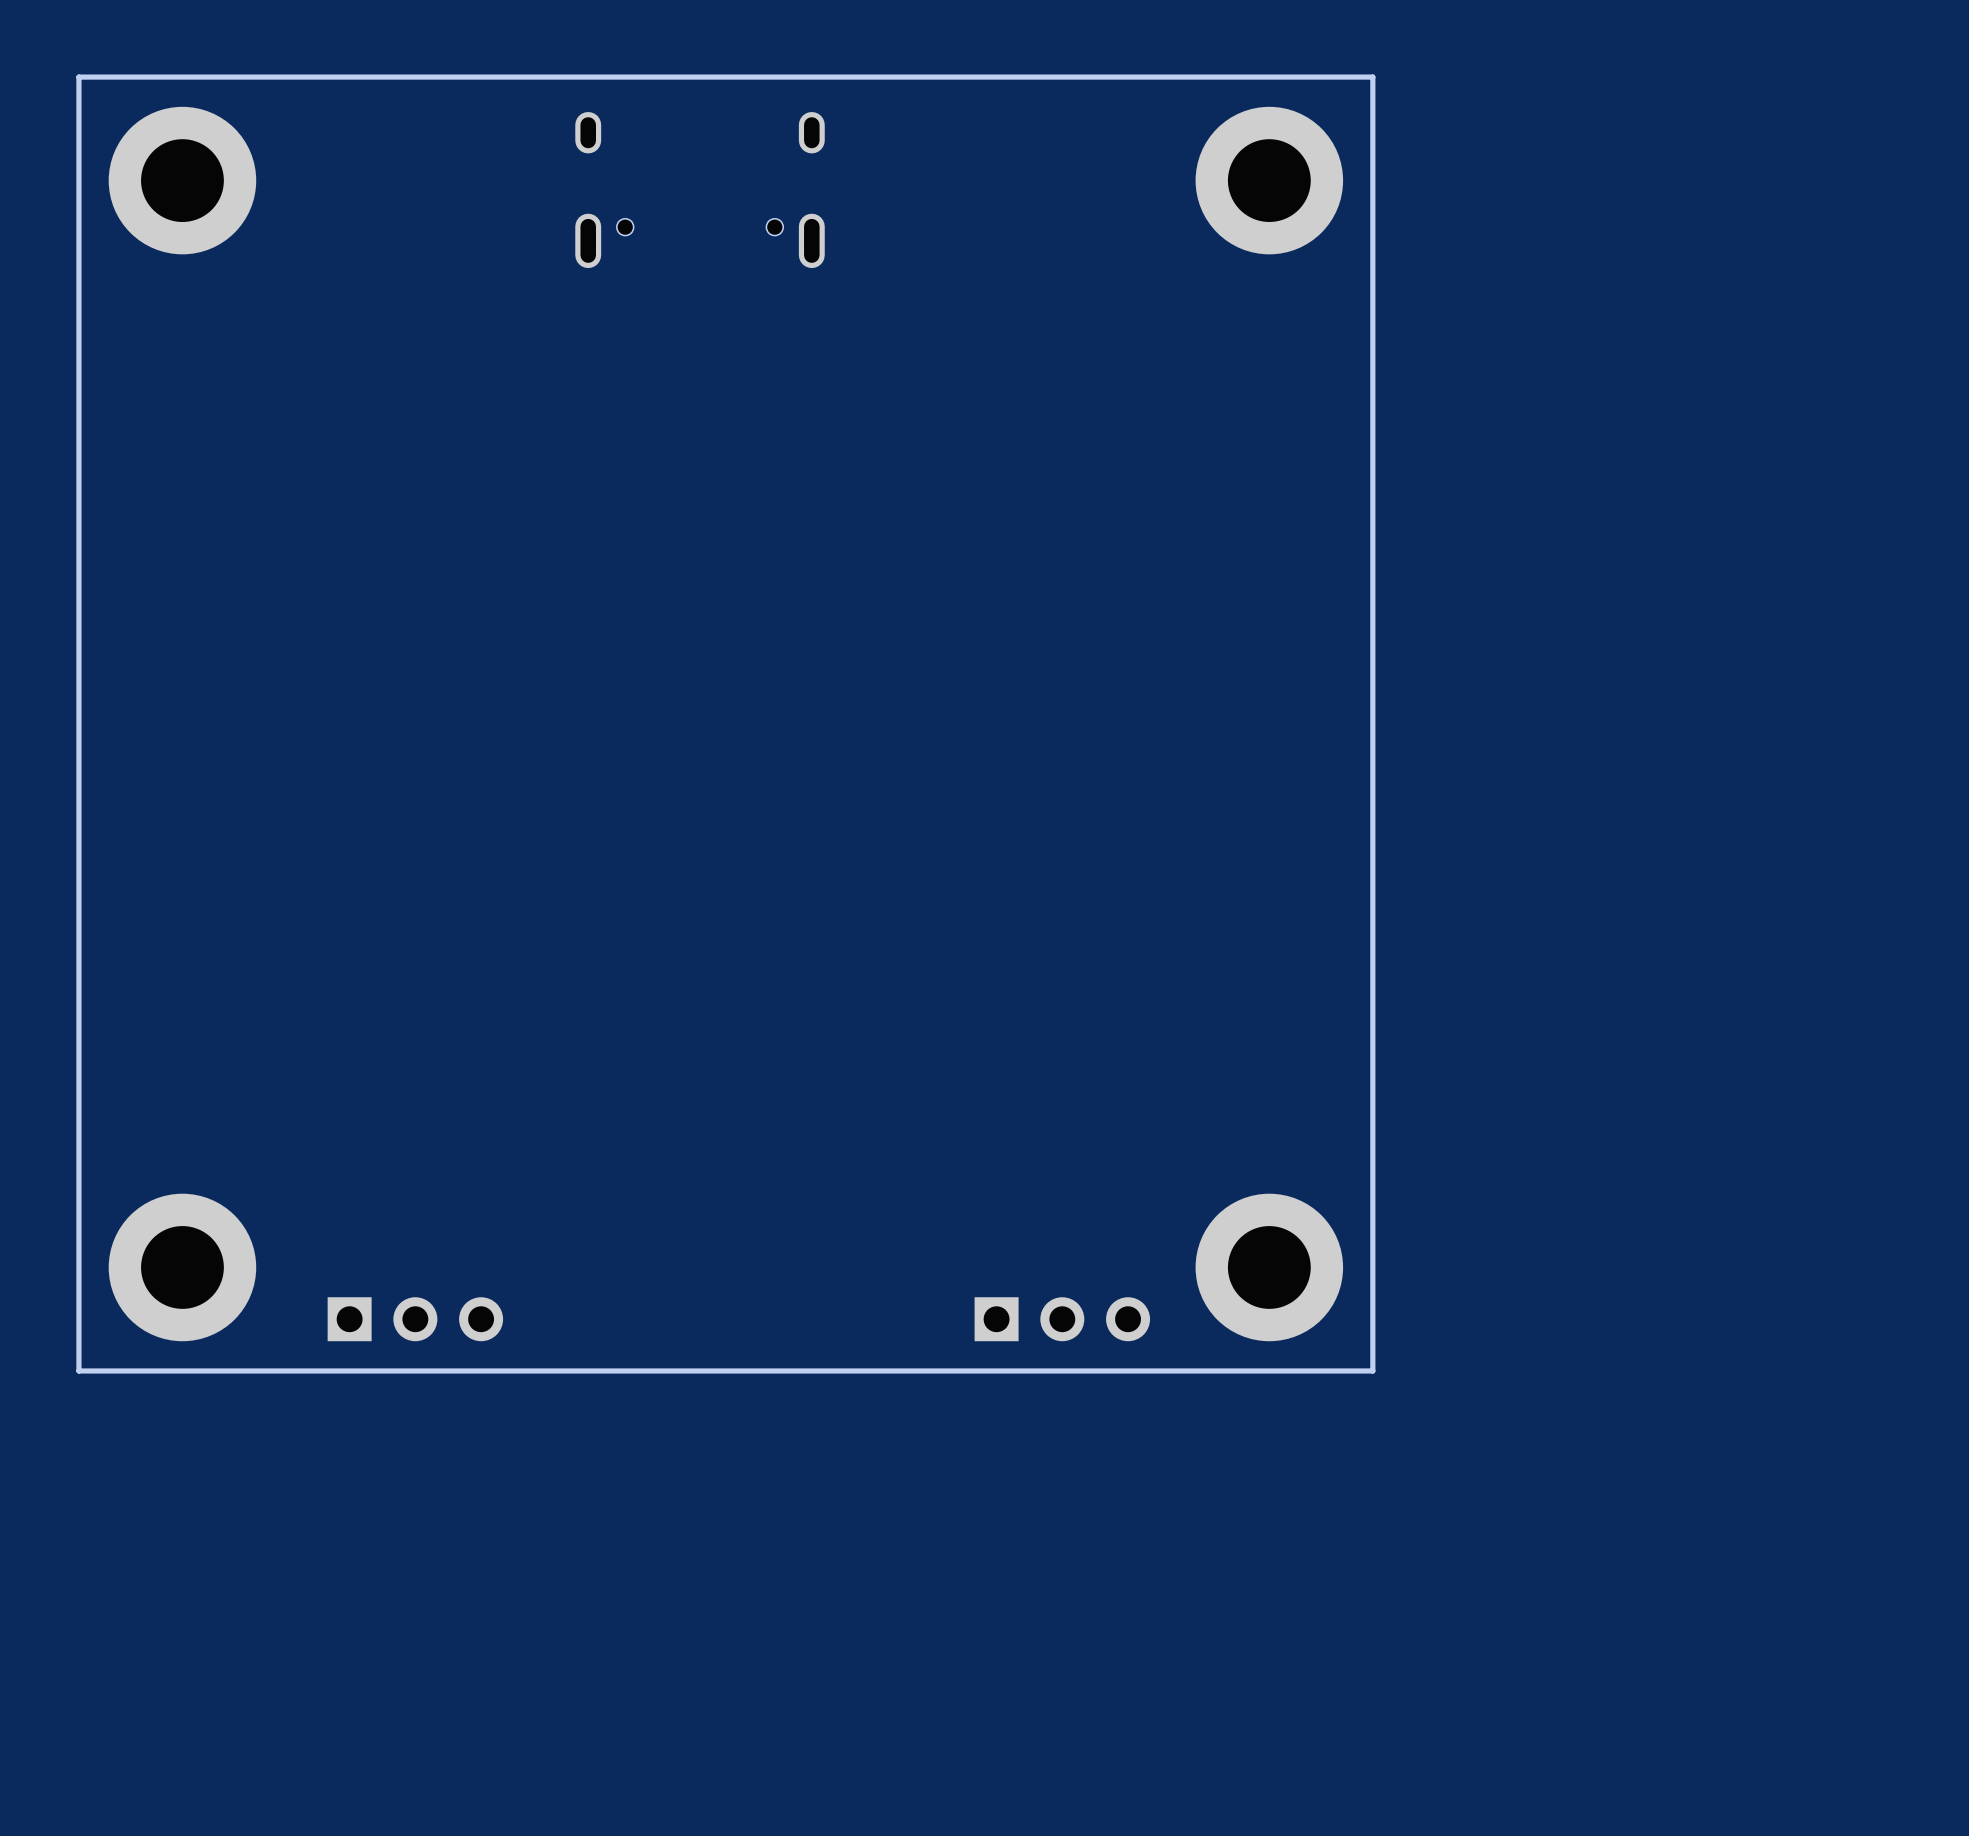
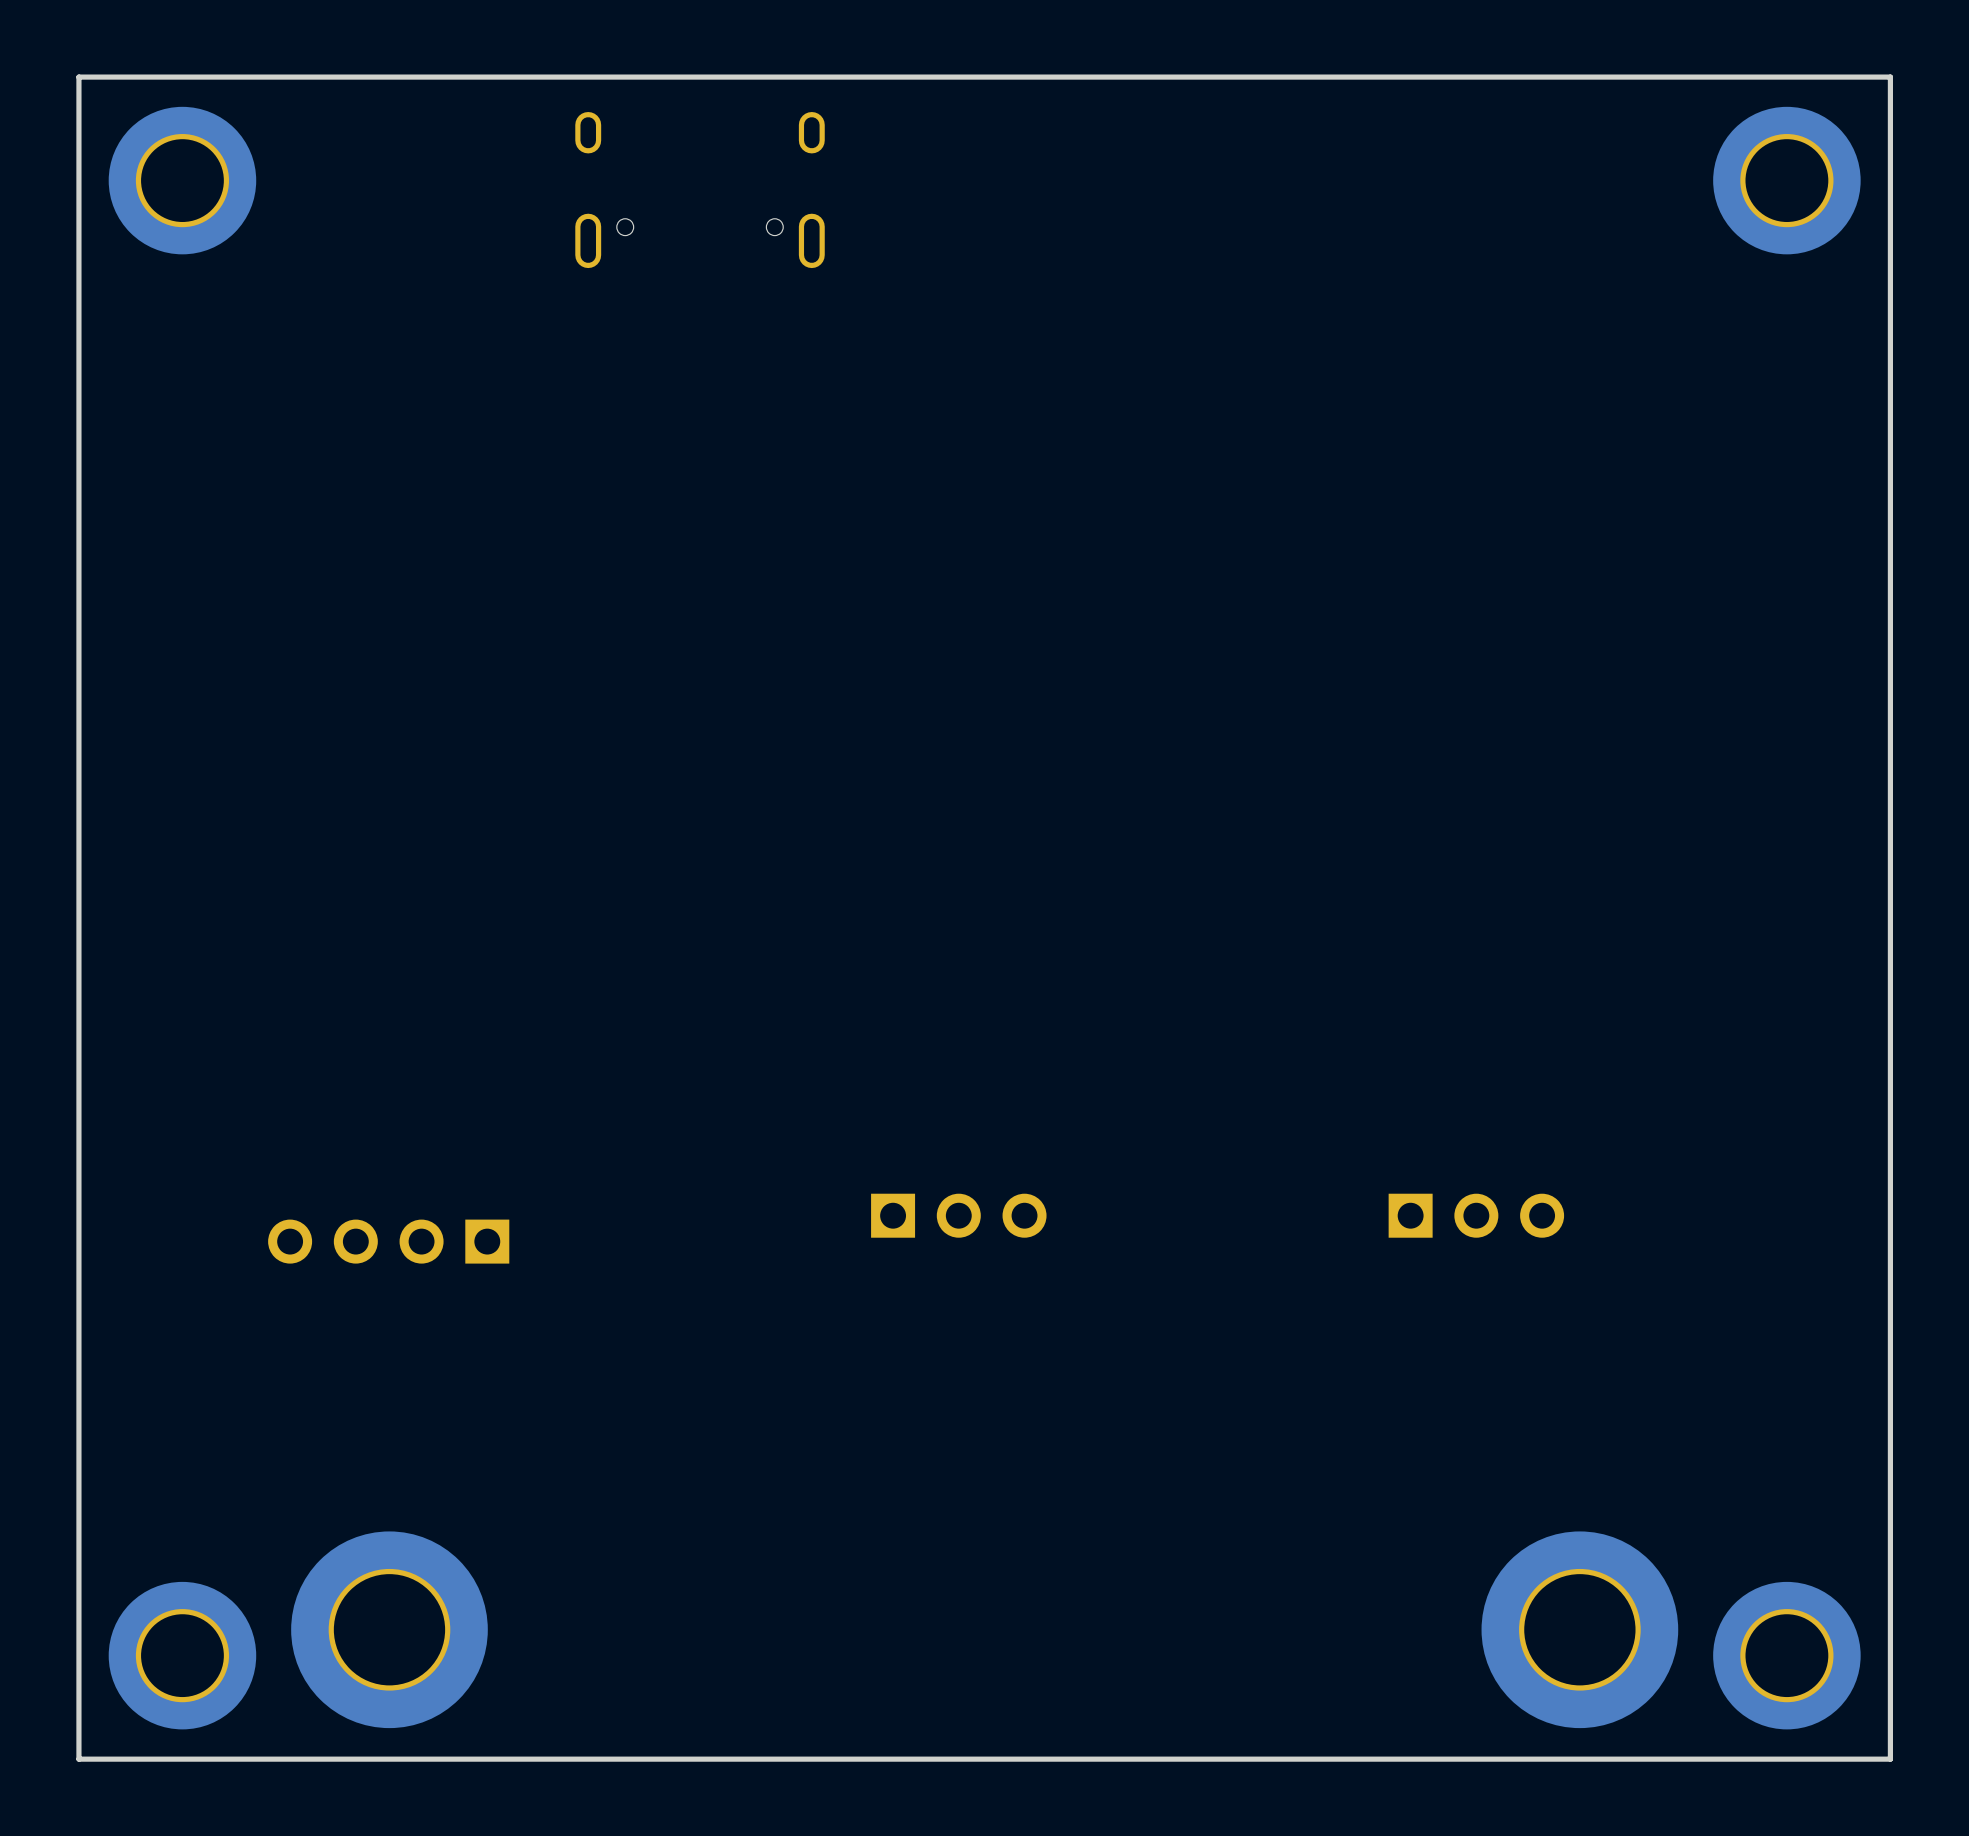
board edge: (1372, 77) (1372, 1370) (78, 1370) -> (1372, 77) (1890, 77) (1890, 1759) (78, 1759) (78, 1370)
part position: (1269, 180) -> (1786, 180)
part: none -> (1476, 1215)
part: none -> (388, 1241)
part position: (182, 1267) -> (182, 1655)
part: (1269, 1267) -> none
part: (415, 1319) -> none
part position: (1062, 1319) -> (958, 1215)
part: none -> (389, 1629)
part: none -> (1579, 1629)
part: none -> (1786, 1655)

